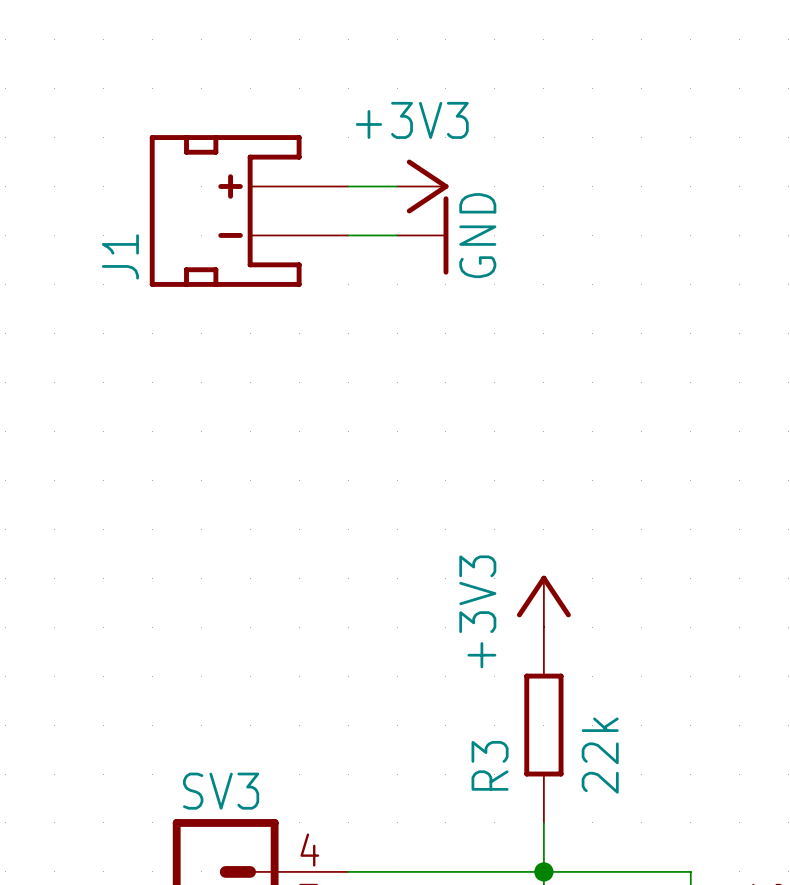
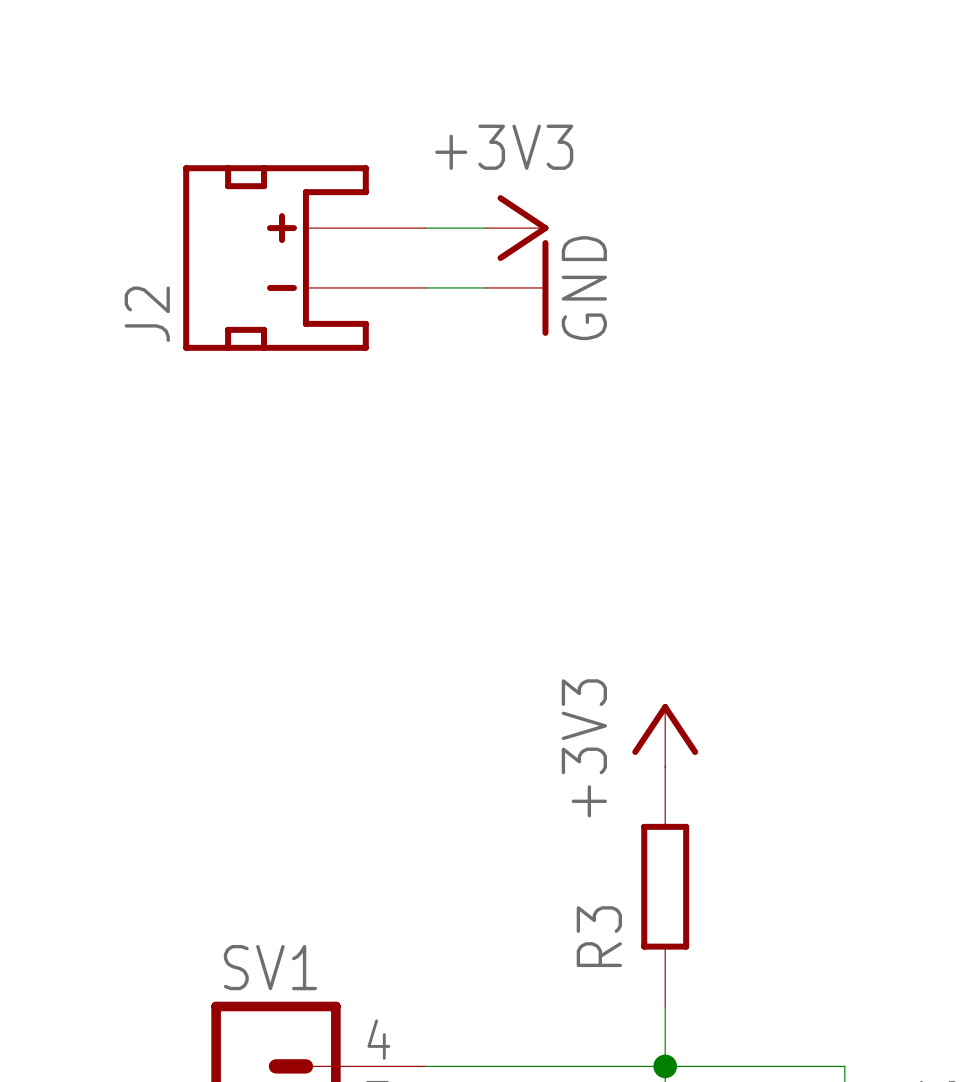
J1 name: J1 (120, 256) -> J2 (147, 314)
R3 value: 22k (600, 755) -> none
SV3 name: SV3 (221, 791) -> SV1 (270, 967)

